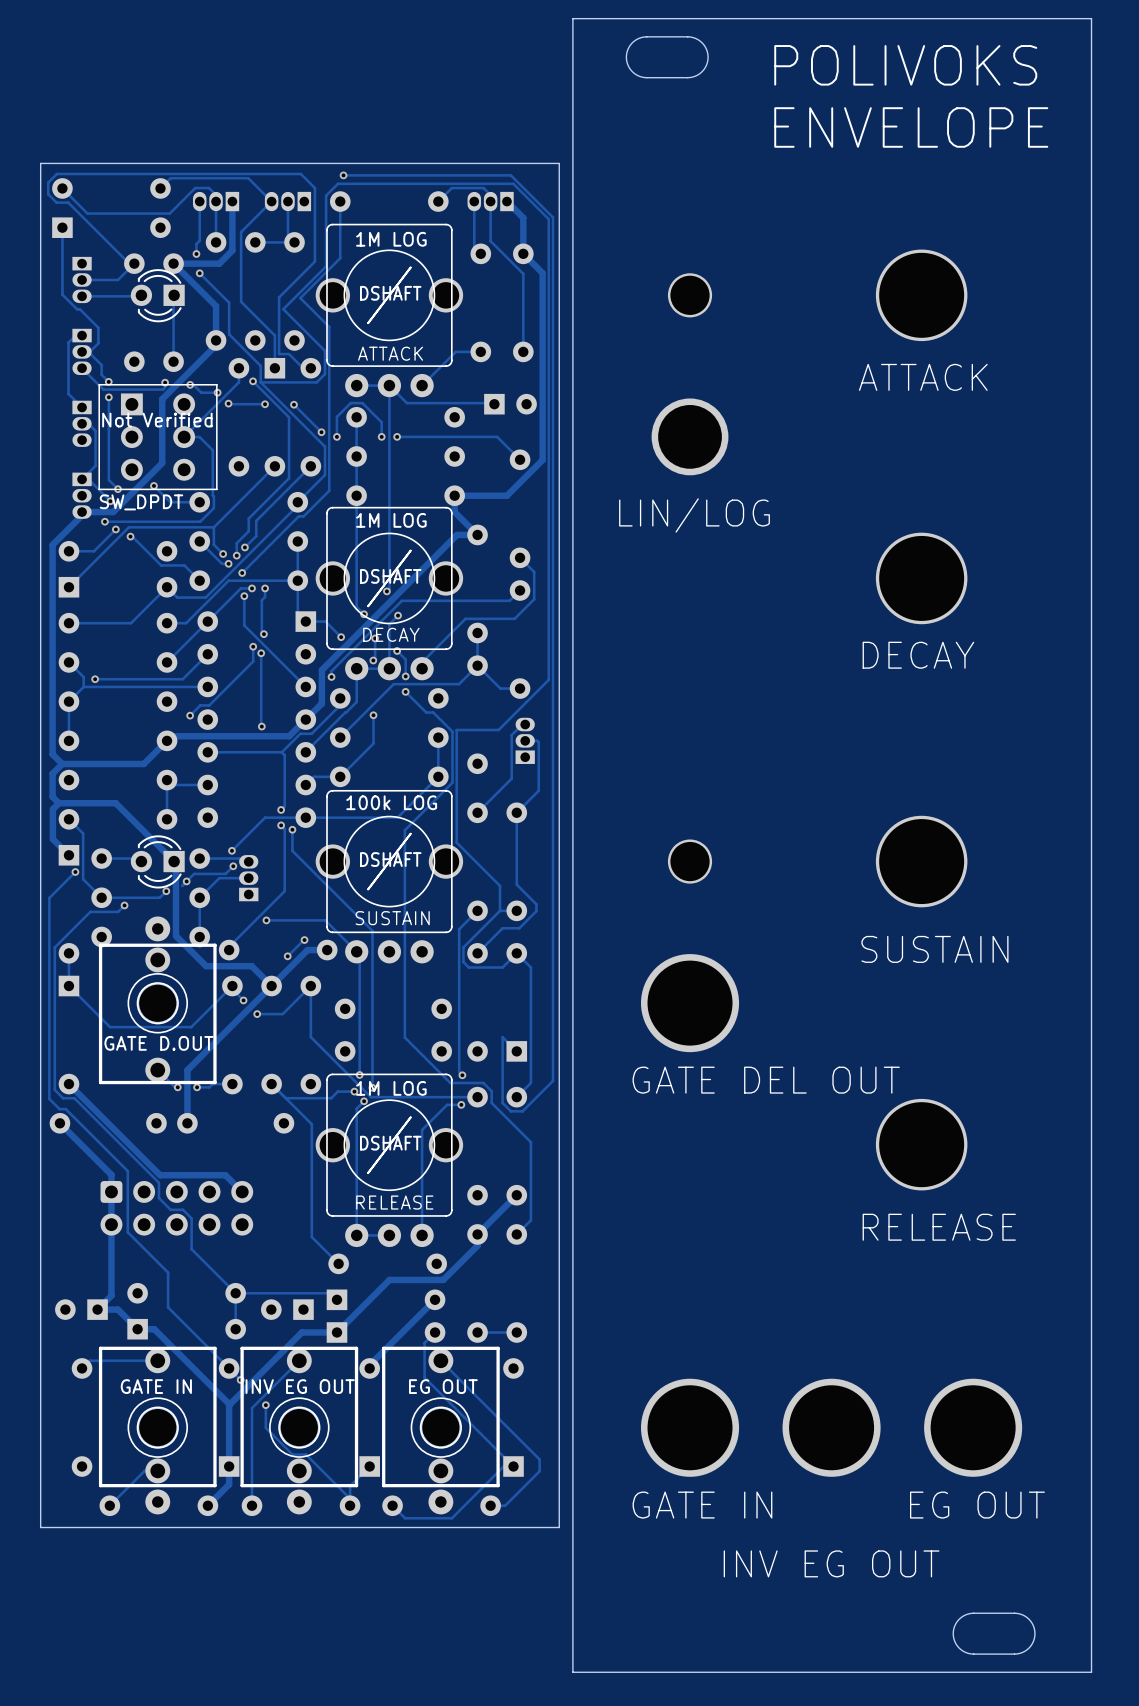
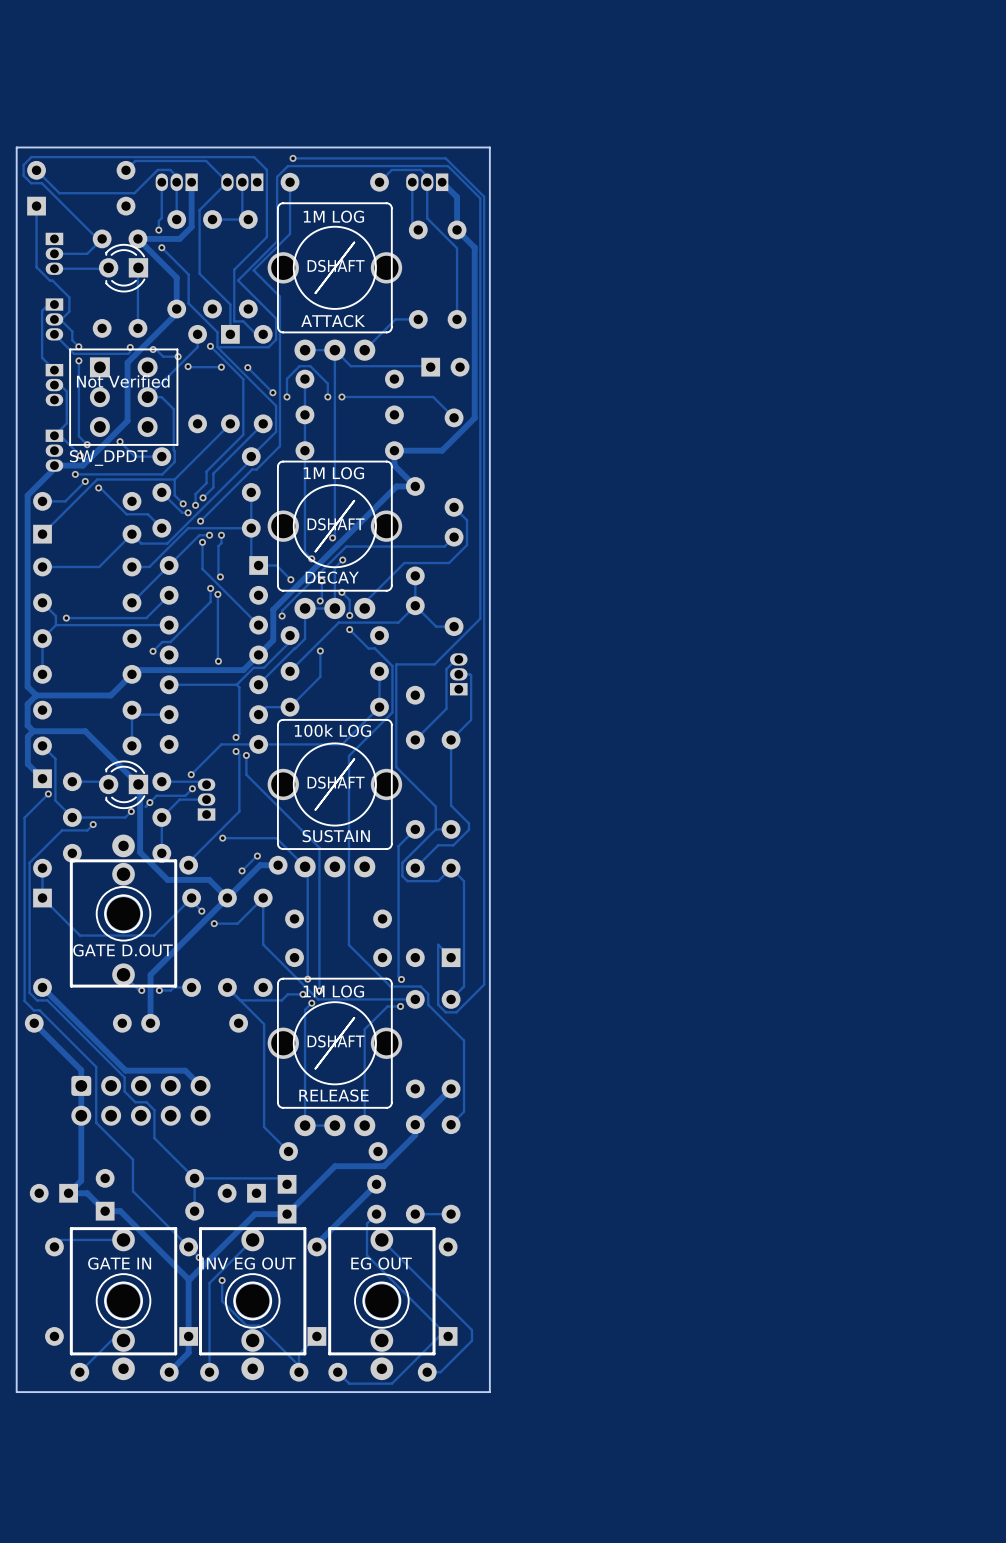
board edge: (572, 18) (1091, 18) (1091, 1672) (572, 1672) (572, 18) -> none
drawing: [625, 36, 709, 79] -> none
text: POLIVOKS (905, 65) -> none
text: ENVELOPE (911, 127) -> none
part: (690, 295) -> none
part: (921, 295) -> none
text: ATTACK (923, 377) -> none
part: (690, 436) -> none
text: LIN/LOG (694, 515) -> none
part: (921, 578) -> none
text: DECAY (918, 655) -> none
part: (690, 861) -> none
part: (921, 861) -> none
text: SUSTAIN (934, 949) -> none
part: (690, 1003) -> none
text: GATE DEL OUT (766, 1080) -> none
part: (921, 1144) -> none
text: RELEASE (939, 1227) -> none
part: (690, 1427) -> none
part: (831, 1427) -> none
part: (973, 1427) -> none
text: GATE IN (702, 1505) -> none
text: EG OUT (977, 1505) -> none
text: INV EG OUT (831, 1563) -> none
drawing: [952, 1612, 1036, 1655] -> none

